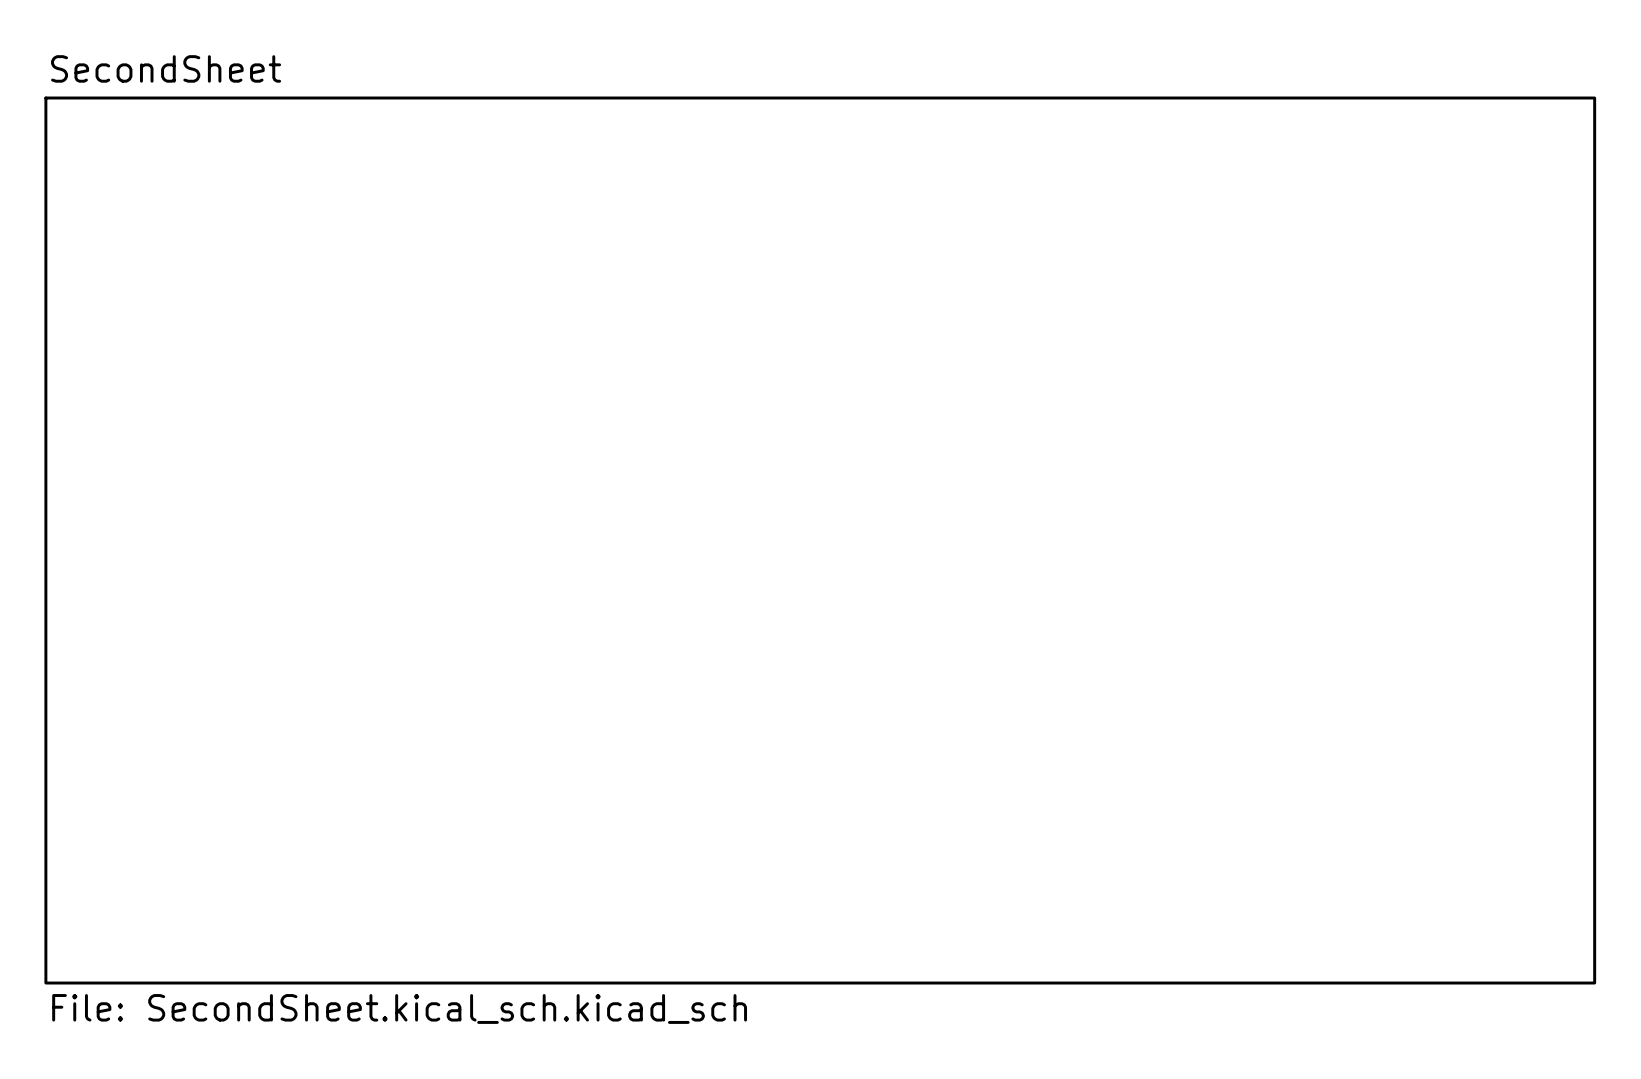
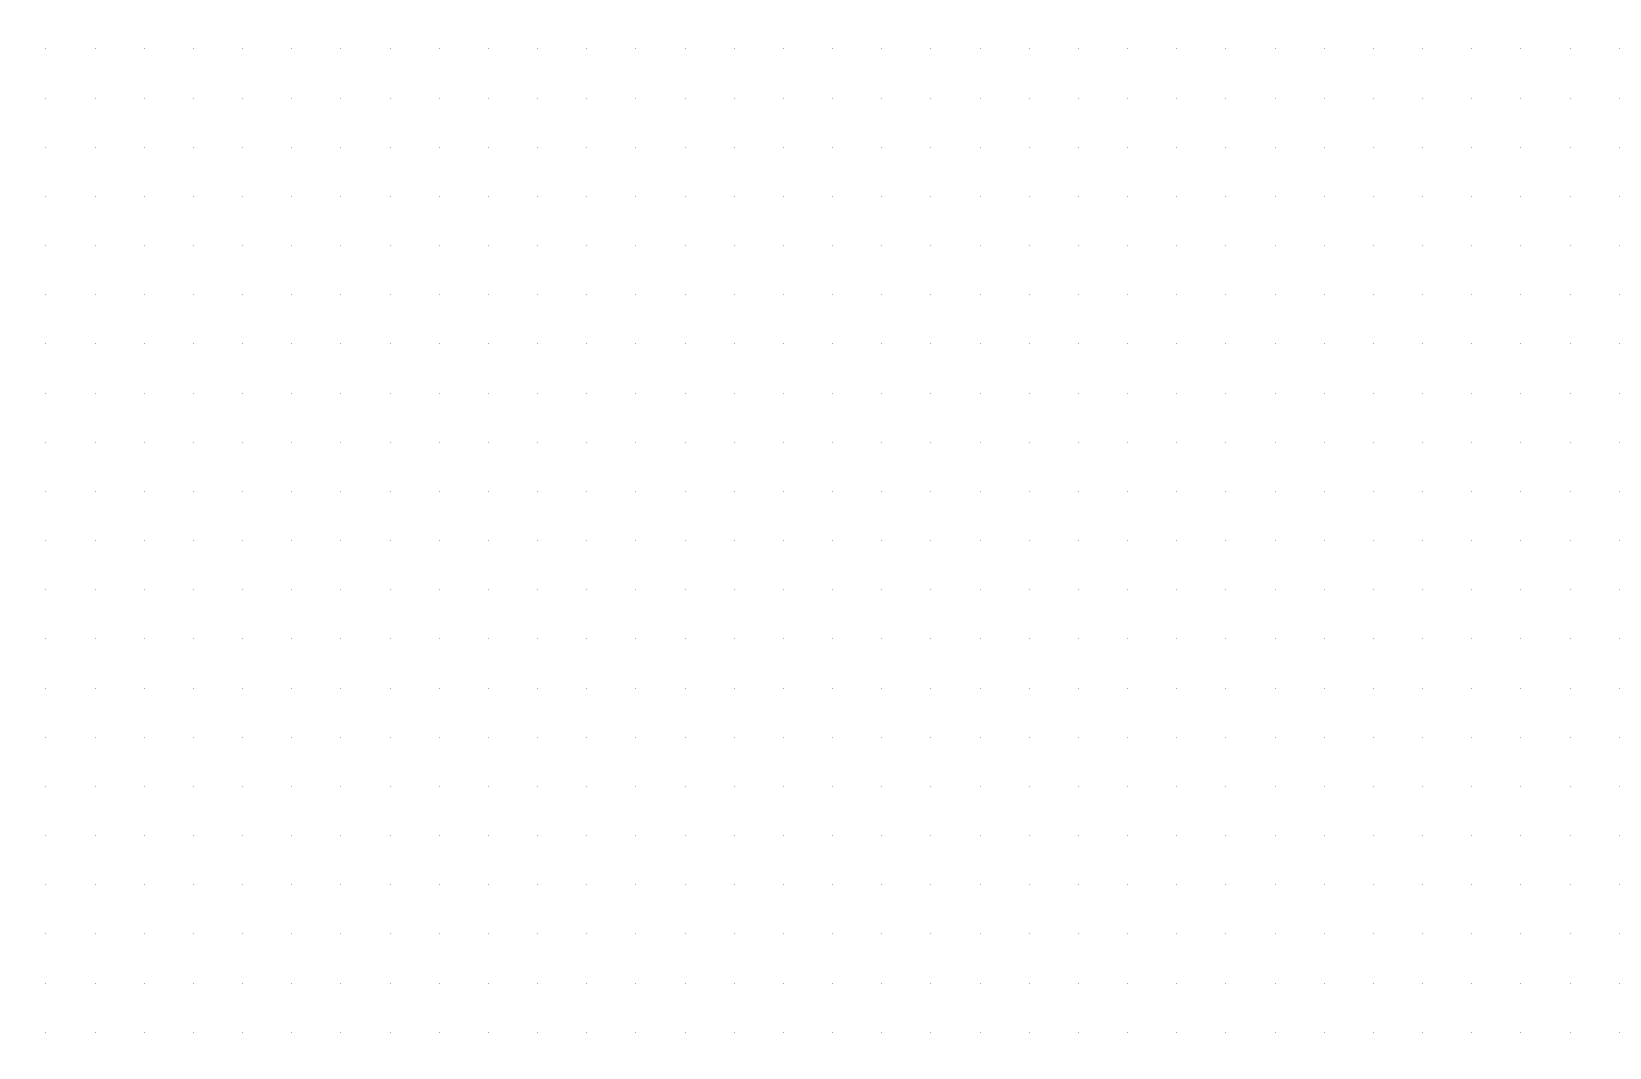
sheet SecondSheet: File: SecondSheet.kical_sch.kicad_sch (820, 540) -> none

